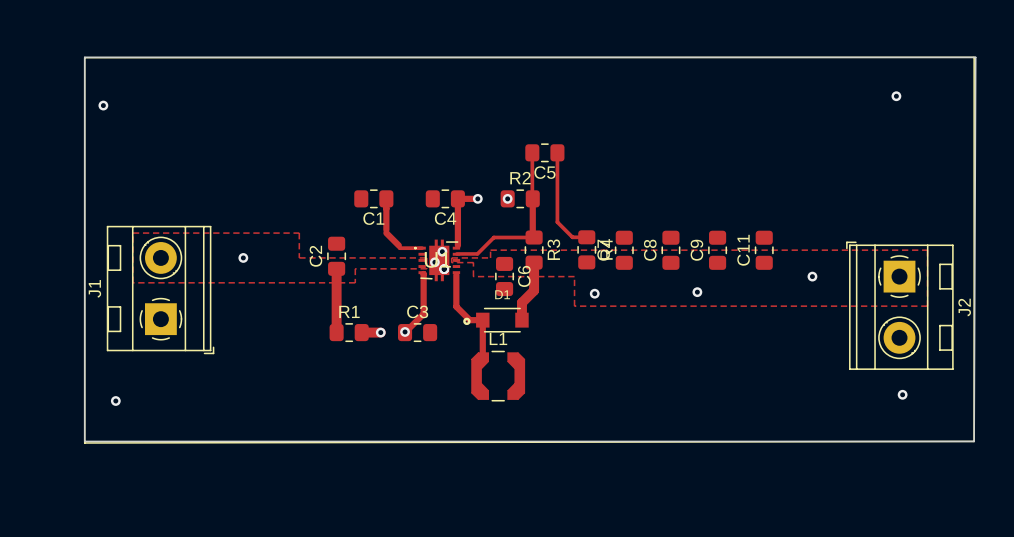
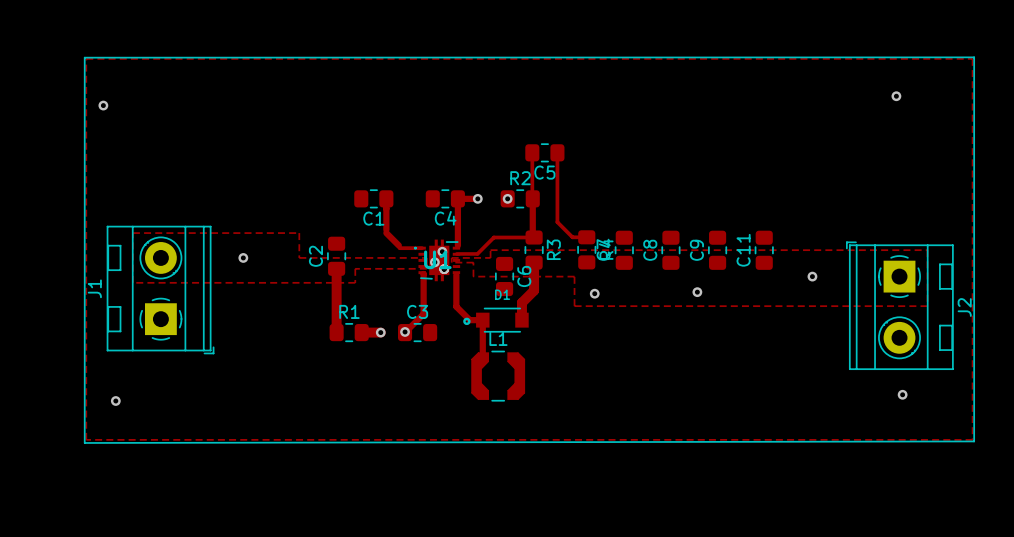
board edge: (84, 57) (84, 441) (974, 441) (975, 57) (84, 57) -> none
zone outline: none -> (86, 58) (972, 58) (972, 439) (86, 439) (86, 58)

